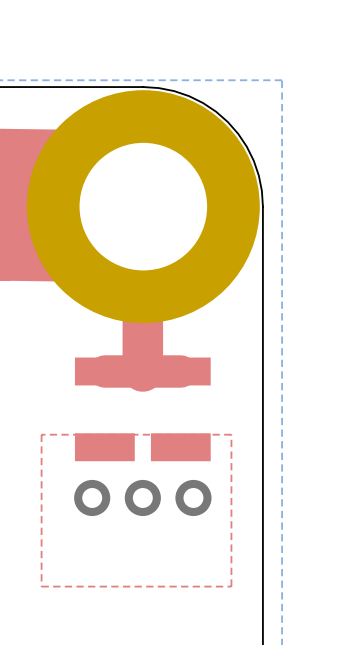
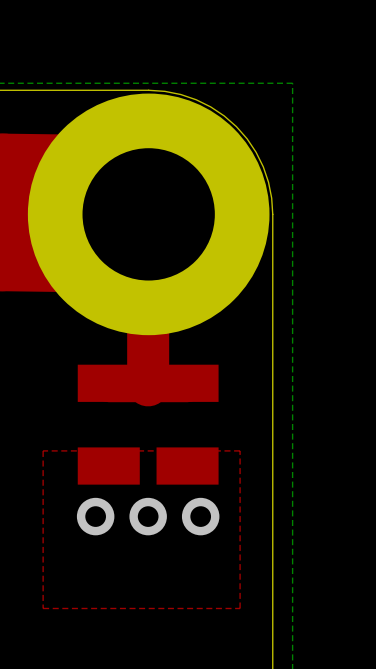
part footprint: [74, 357, 135, 462] -> [77, 364, 140, 485]
part footprint: [150, 357, 211, 462] -> [156, 364, 219, 485]

